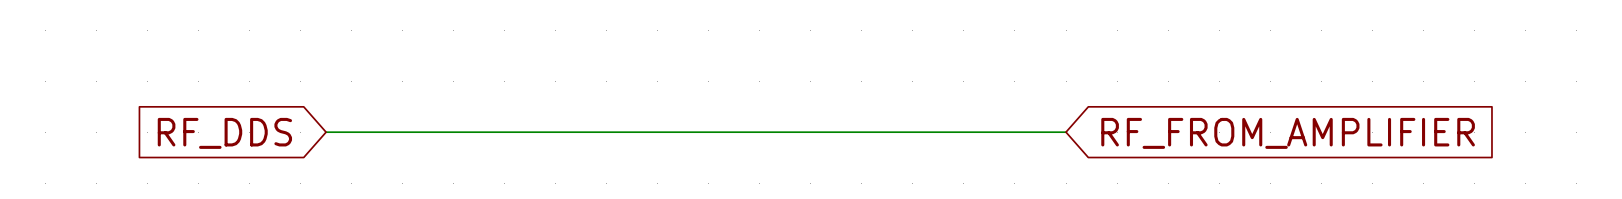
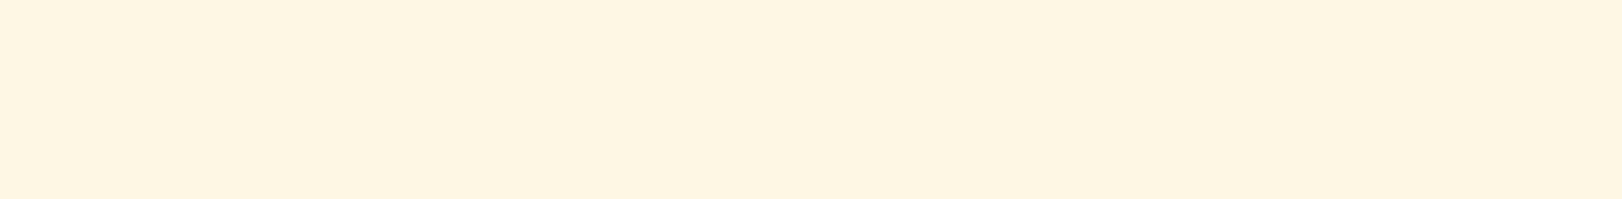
wire: (326, 132) (1066, 132) -> none
global label: RF_DDS (224, 133) -> none
global label: RF_FROM_AMPLIFIER (1288, 133) -> none

